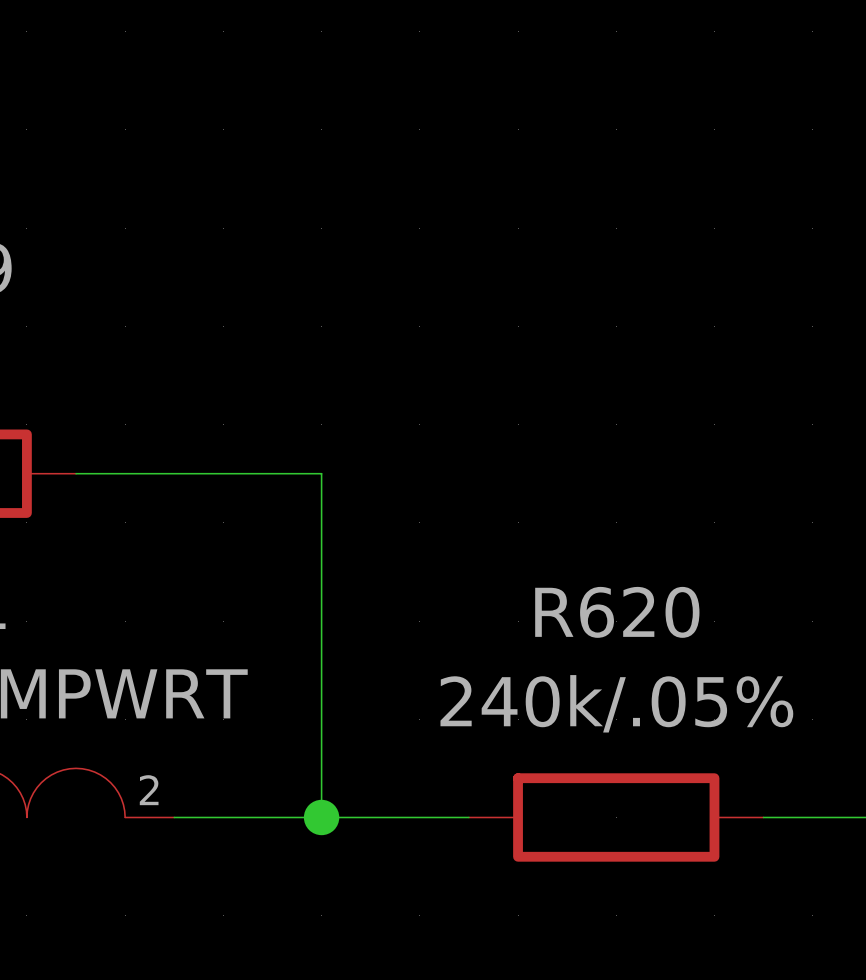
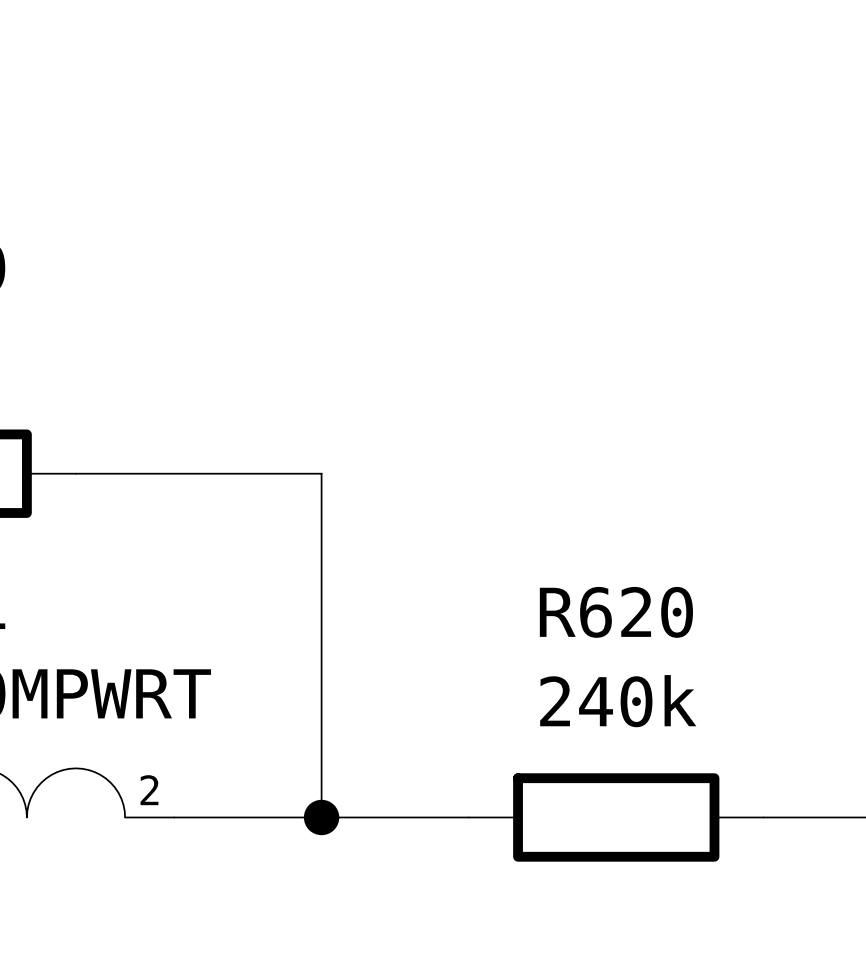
R620 value: 240k/.05% (616, 703) -> 240k (618, 701)

